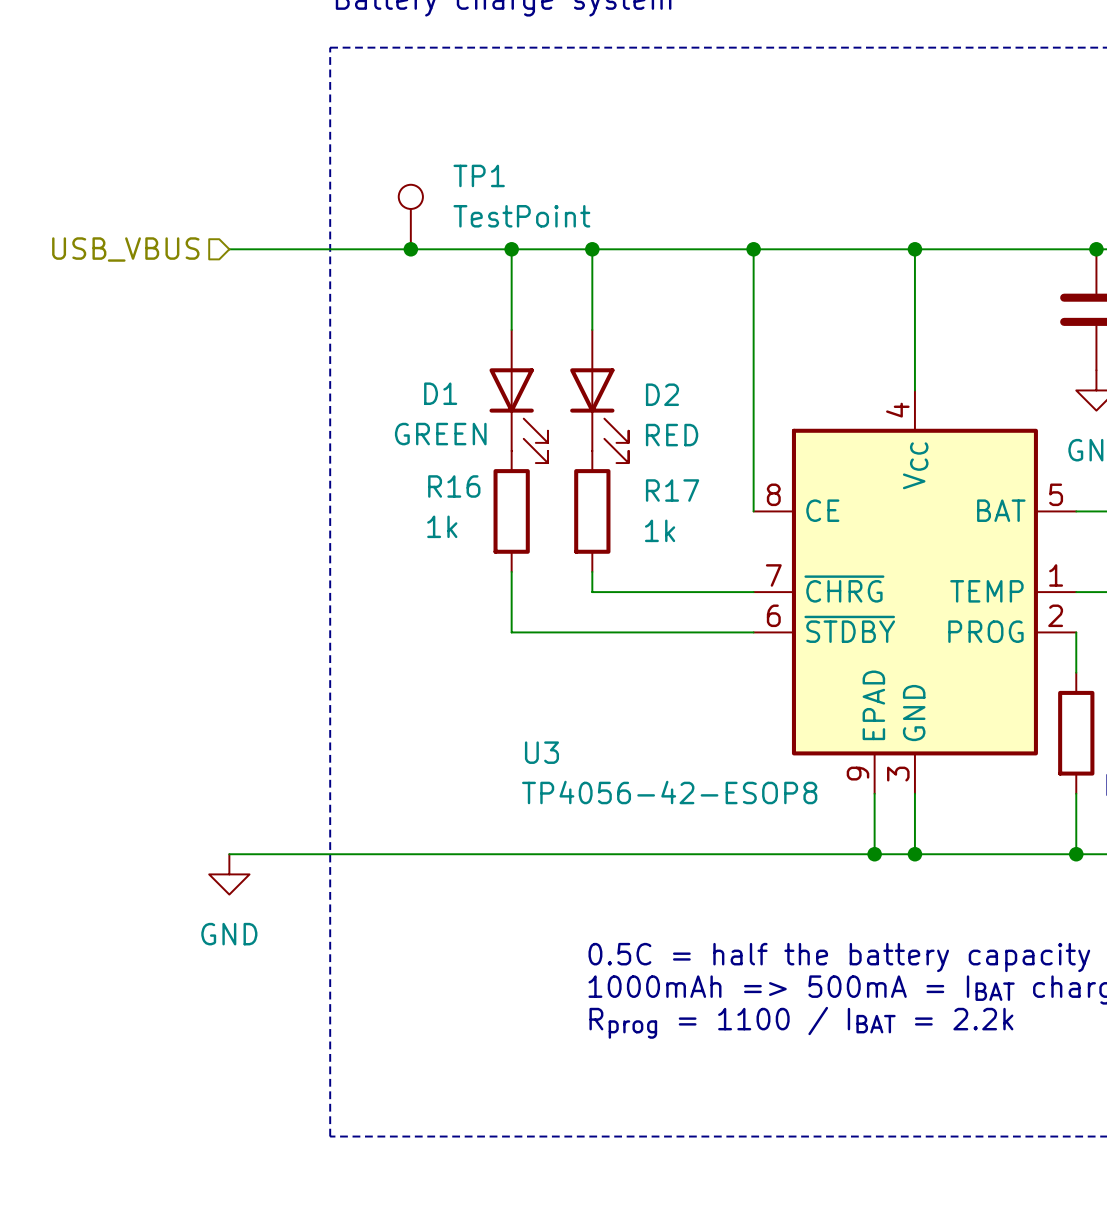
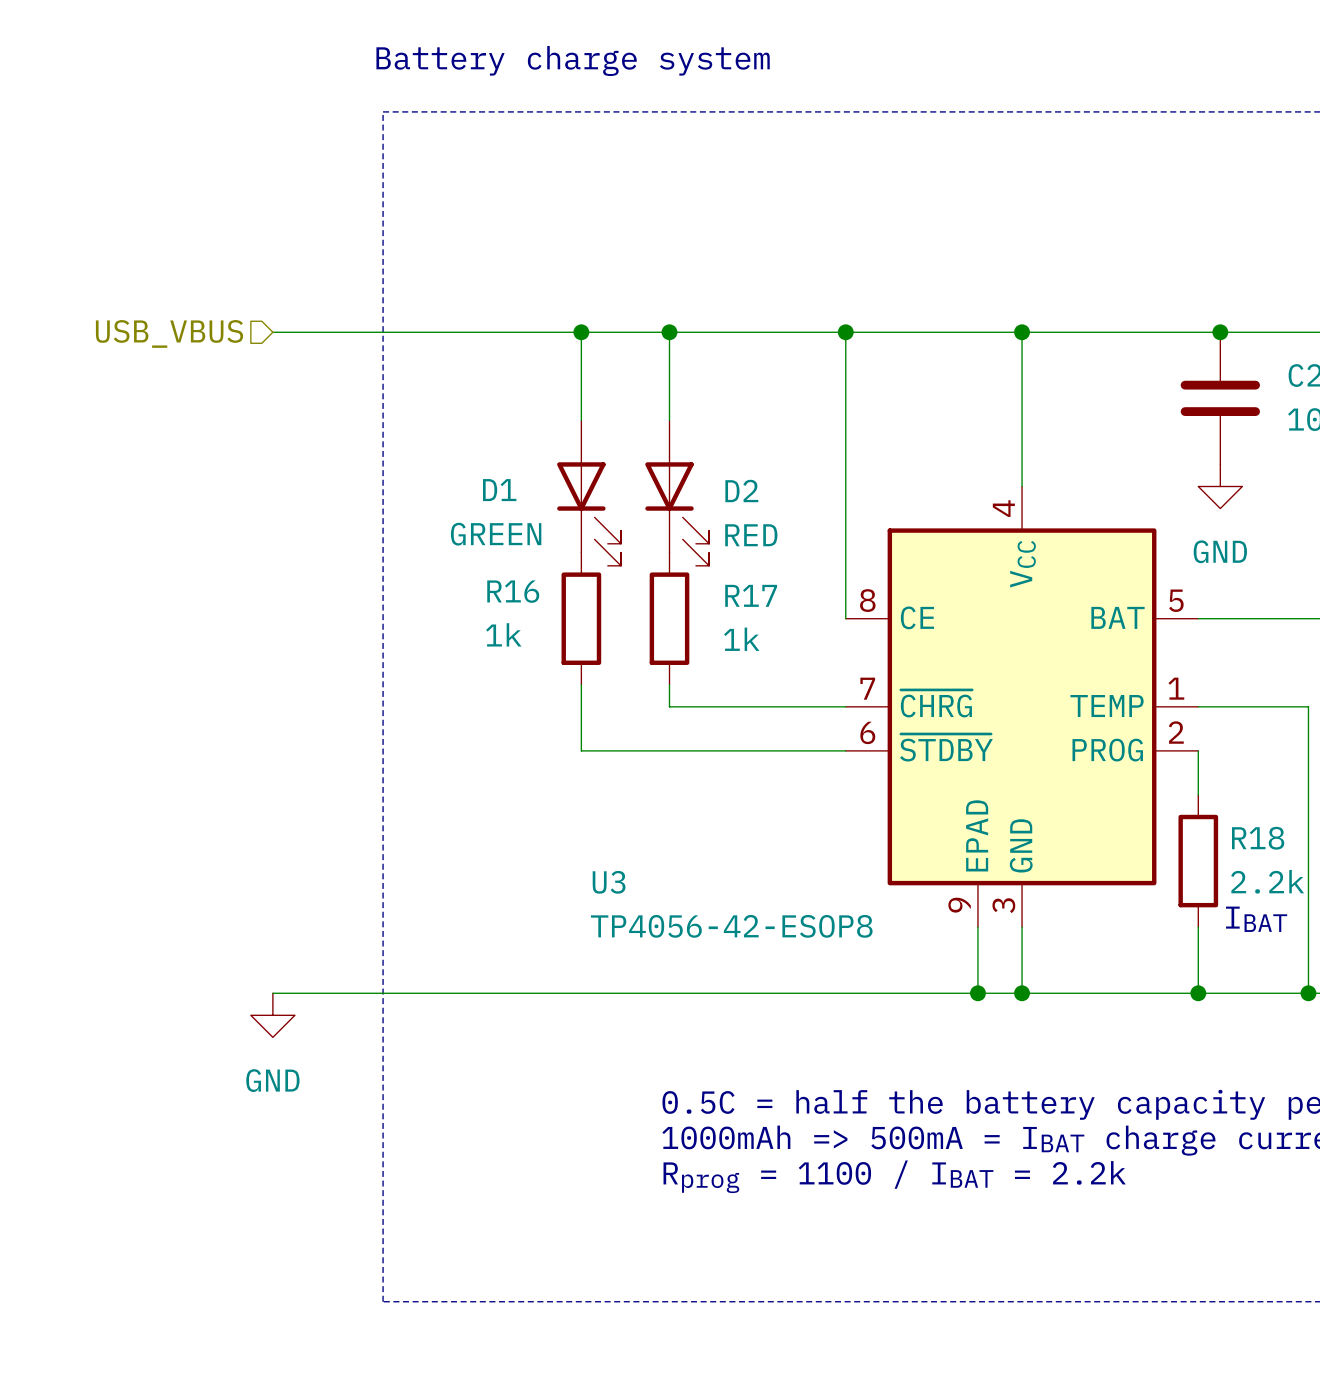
TP1: TestPoint (410, 217) -> none
junction: (410, 249) -> none

